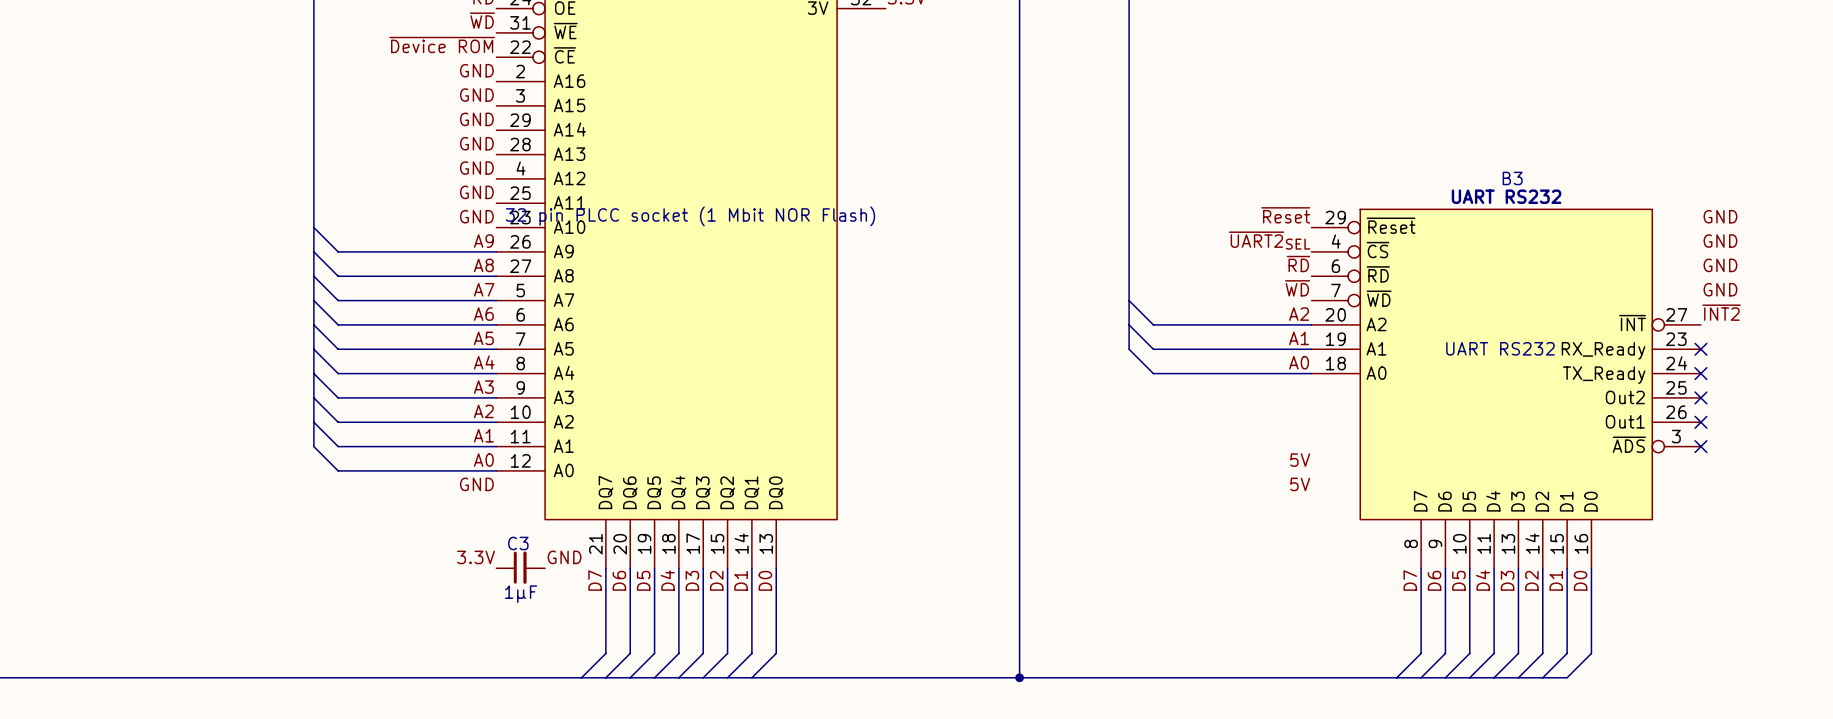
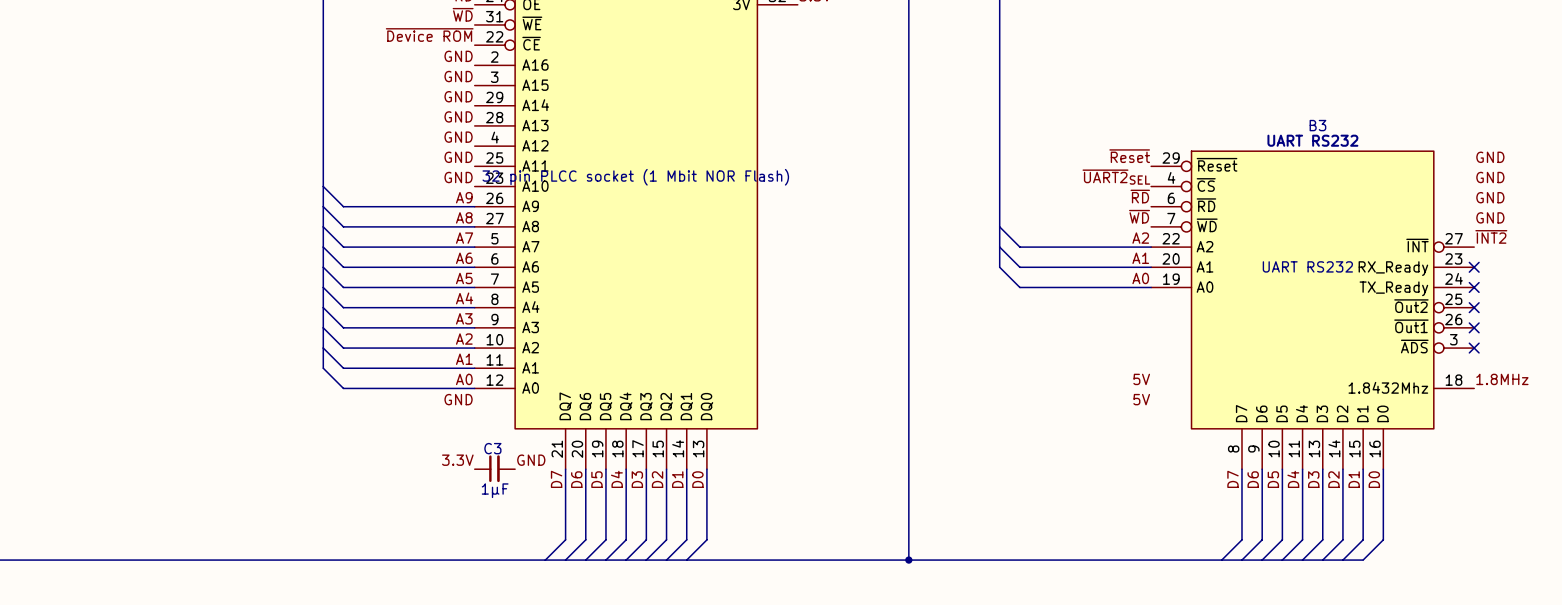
label: none -> ~{Reset} (1129, 156)
label: none -> GND (1490, 157)
B3 symbol: [1311, 208, 1701, 569] -> [1151, 150, 1475, 470]
label: ~{Reset} (1285, 215) -> ~{UART2}SEL (1116, 177)
label: ~{UART2}SEL (1269, 240) -> ~{RD} (1140, 196)
label: ~{RD} (1298, 264) -> ~{WD} (1139, 216)
label: ~{WD} (1297, 288) -> A2 (1140, 238)
label: GND (1720, 289) -> ~{INT2} (1491, 236)
label: ~{INT2} (1721, 312) -> none
label: A2 (1299, 314) -> A1 (1140, 258)
bus: (1129, 324) (1129, 349) -> none
no-connect mark: none -> (1474, 267)
label: A1 (1299, 338) -> A0 (1140, 278)
wire: (1129, 349) (1153, 373) (1311, 373) -> (999, 226) (1019, 247) (1151, 247)
label: A0 (1299, 362) -> none
no-connect mark: (1700, 446) -> none
label: none -> 1.8MHz (1502, 379)

